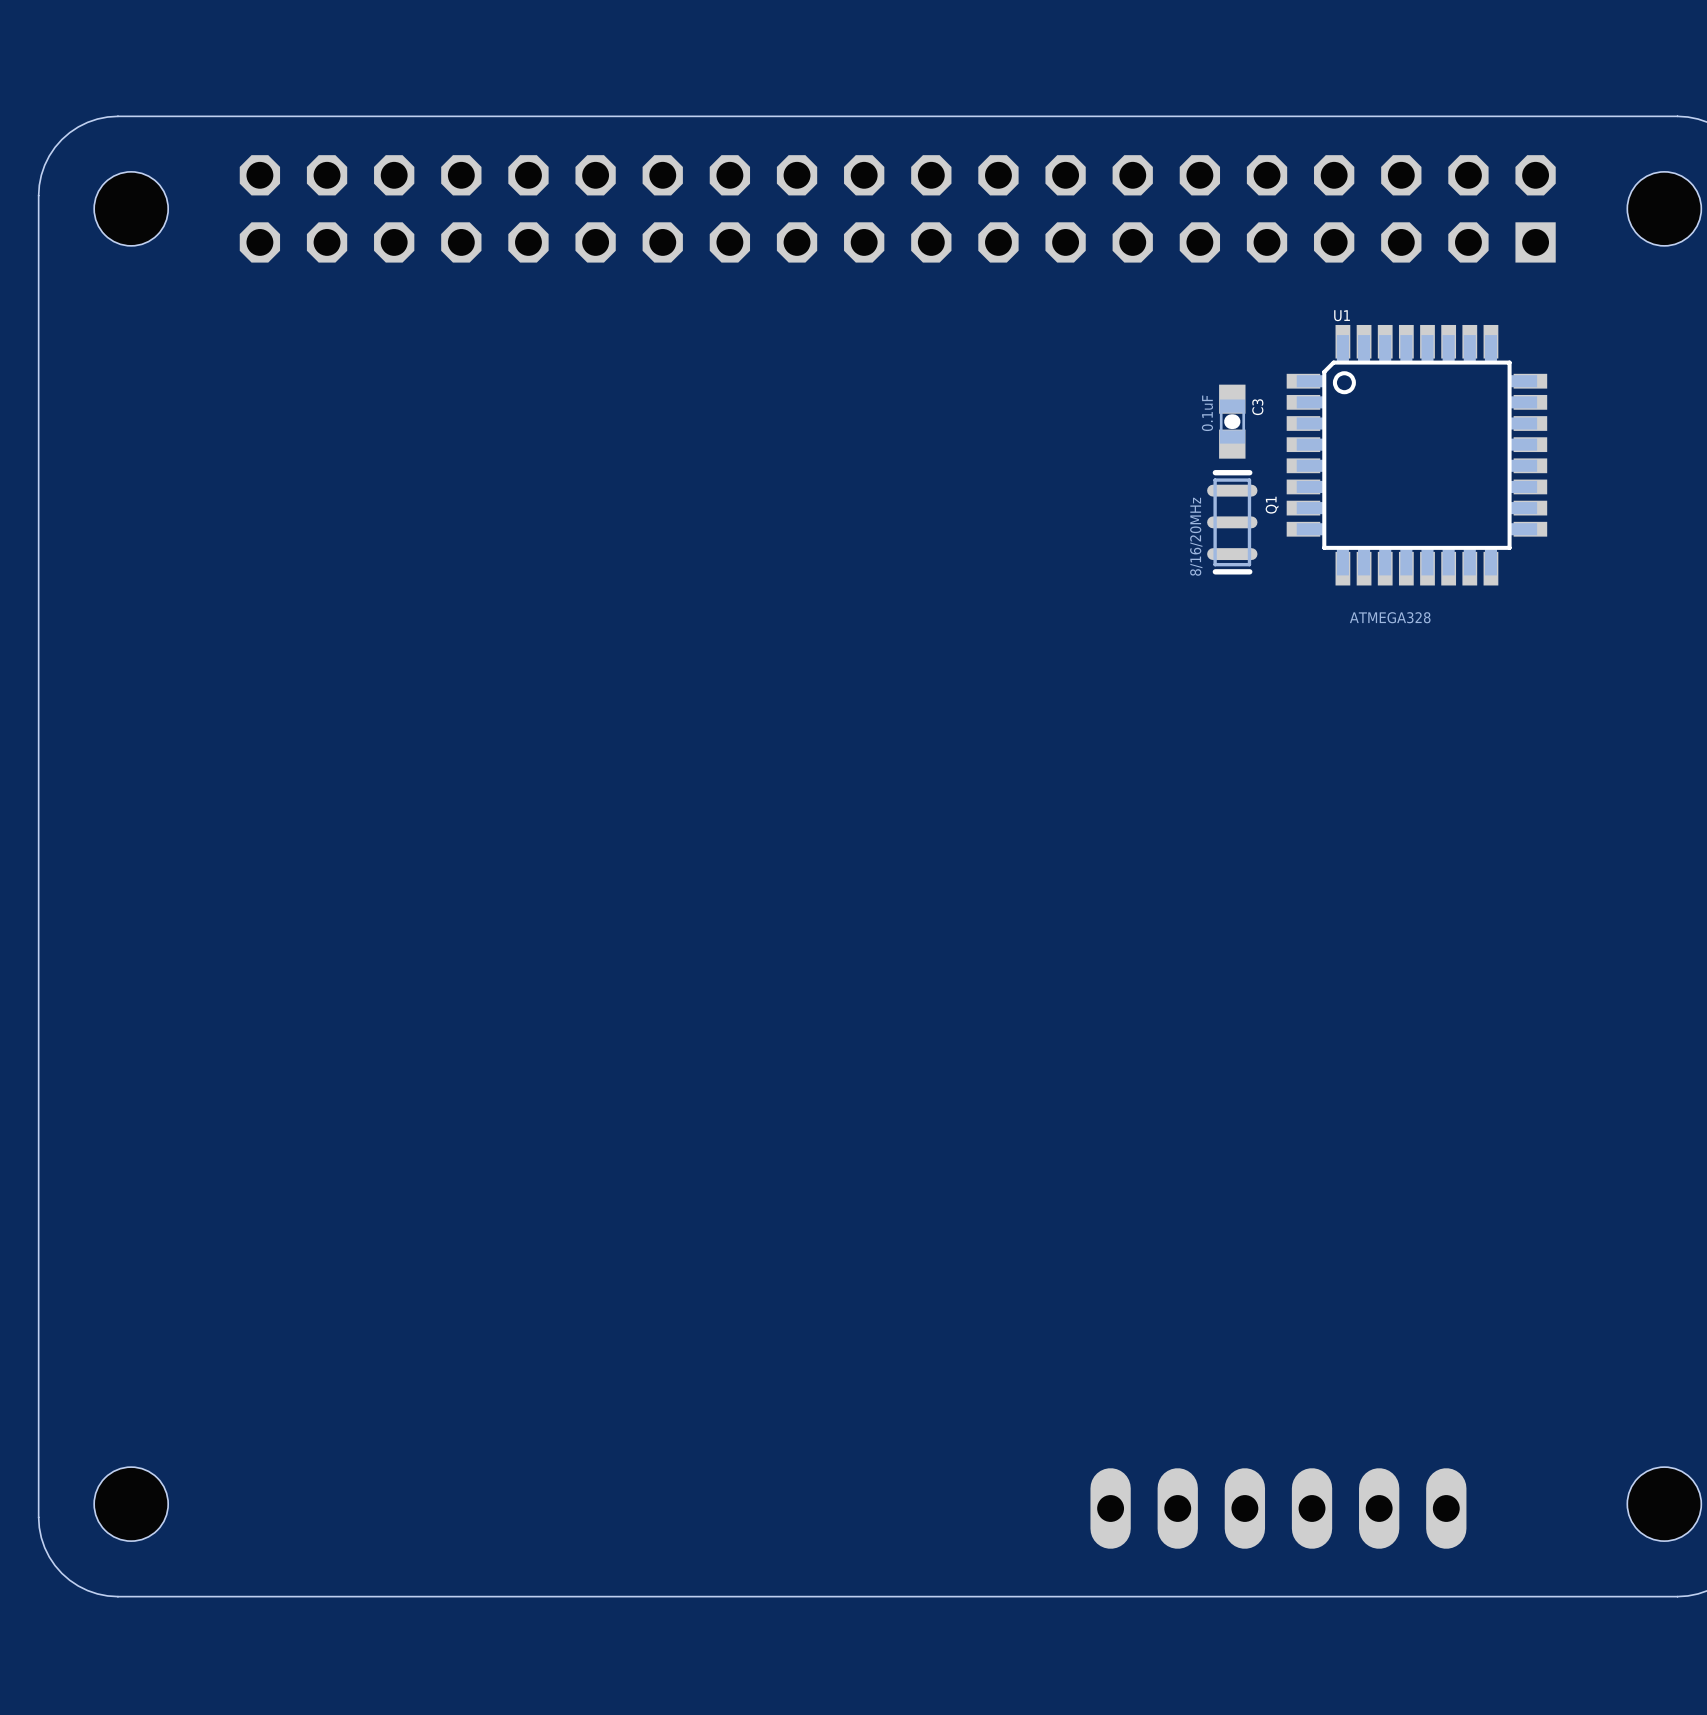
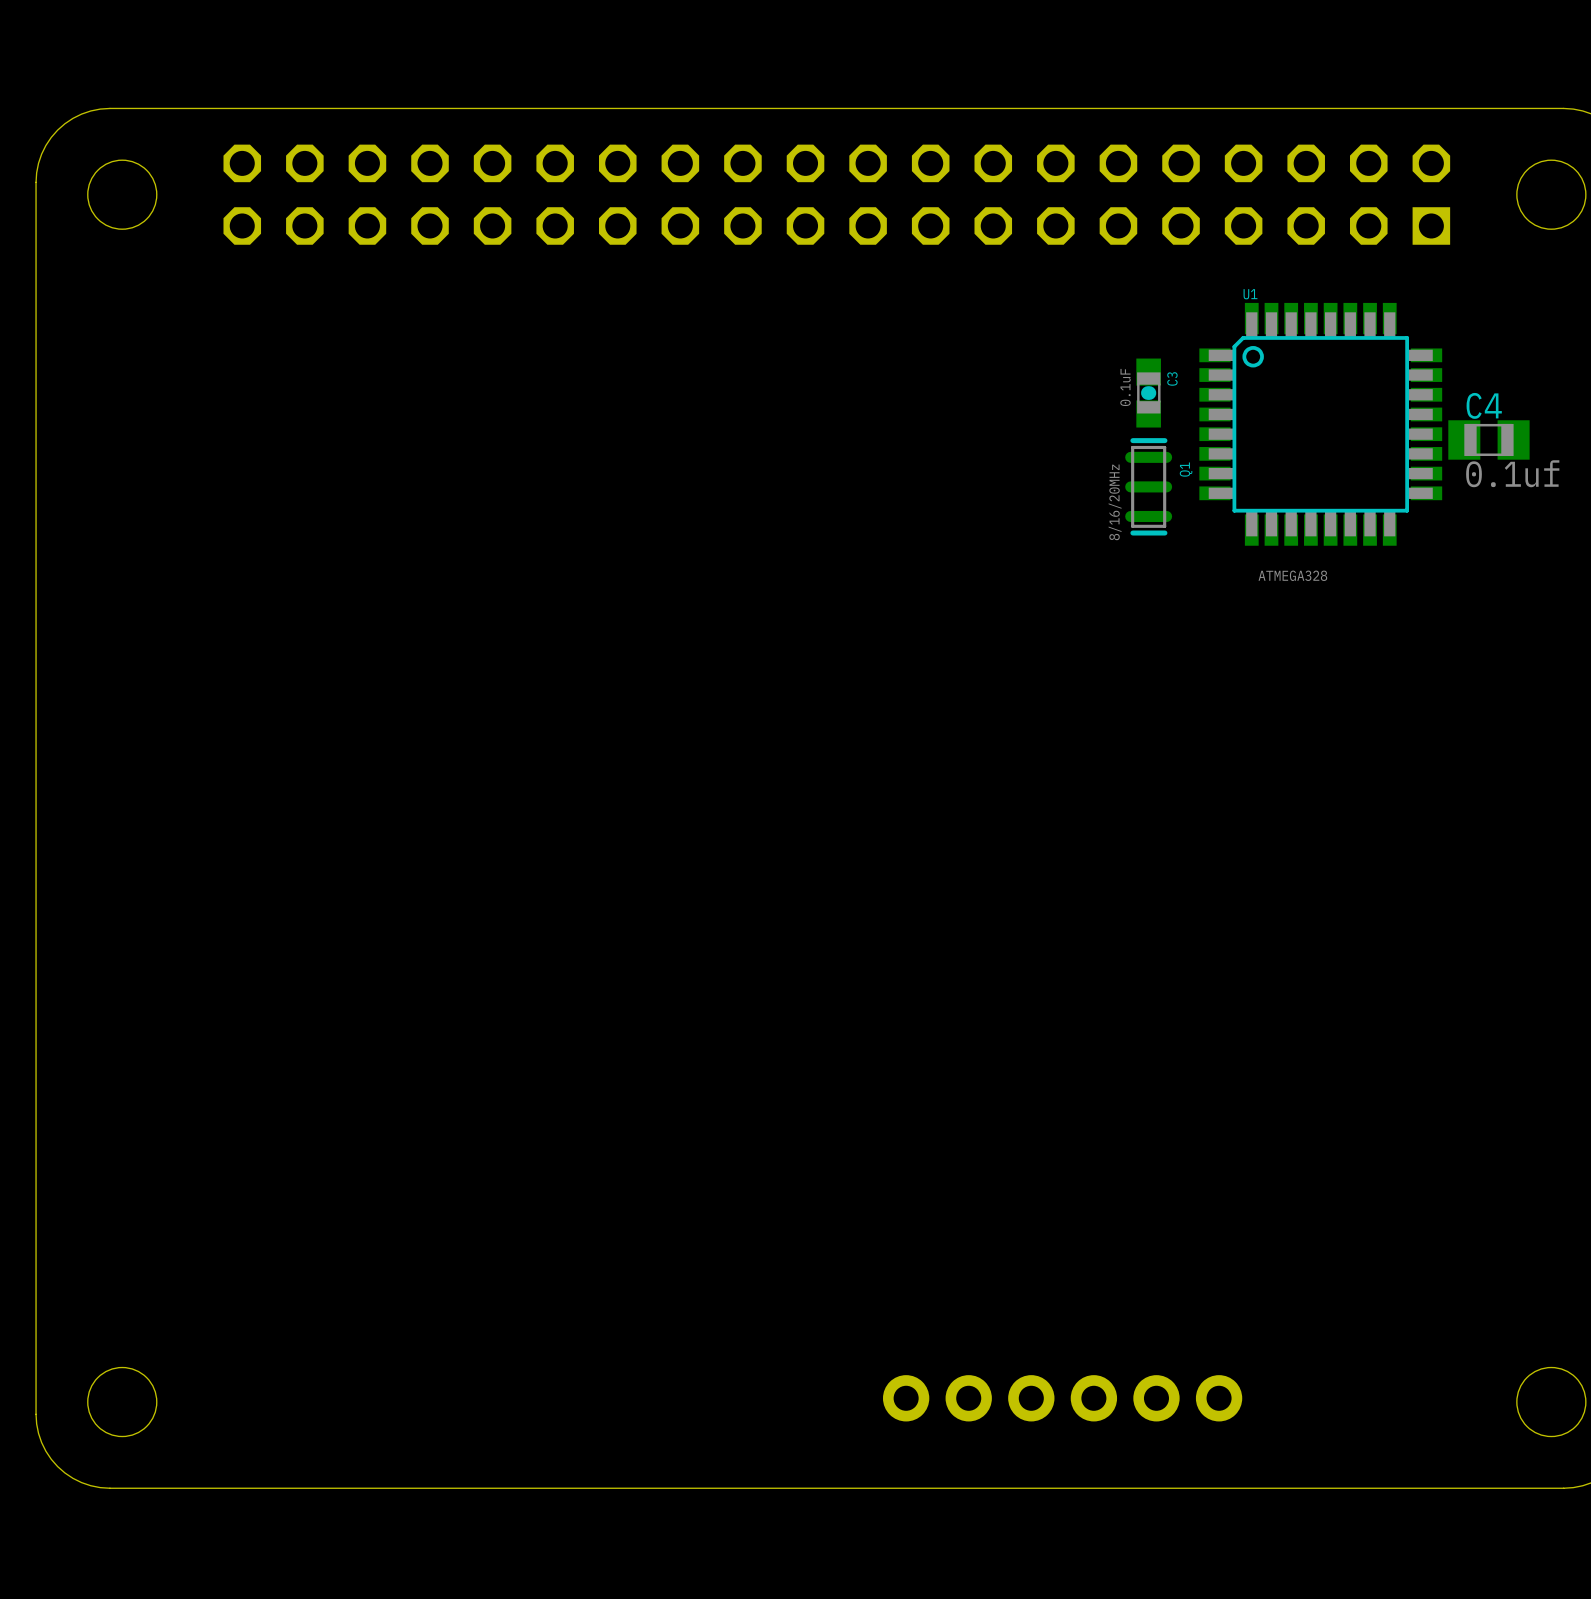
C4: none -> 0.1uf (1488, 439)
part: none -> (1062, 1398)
part: (1278, 1508) -> none

